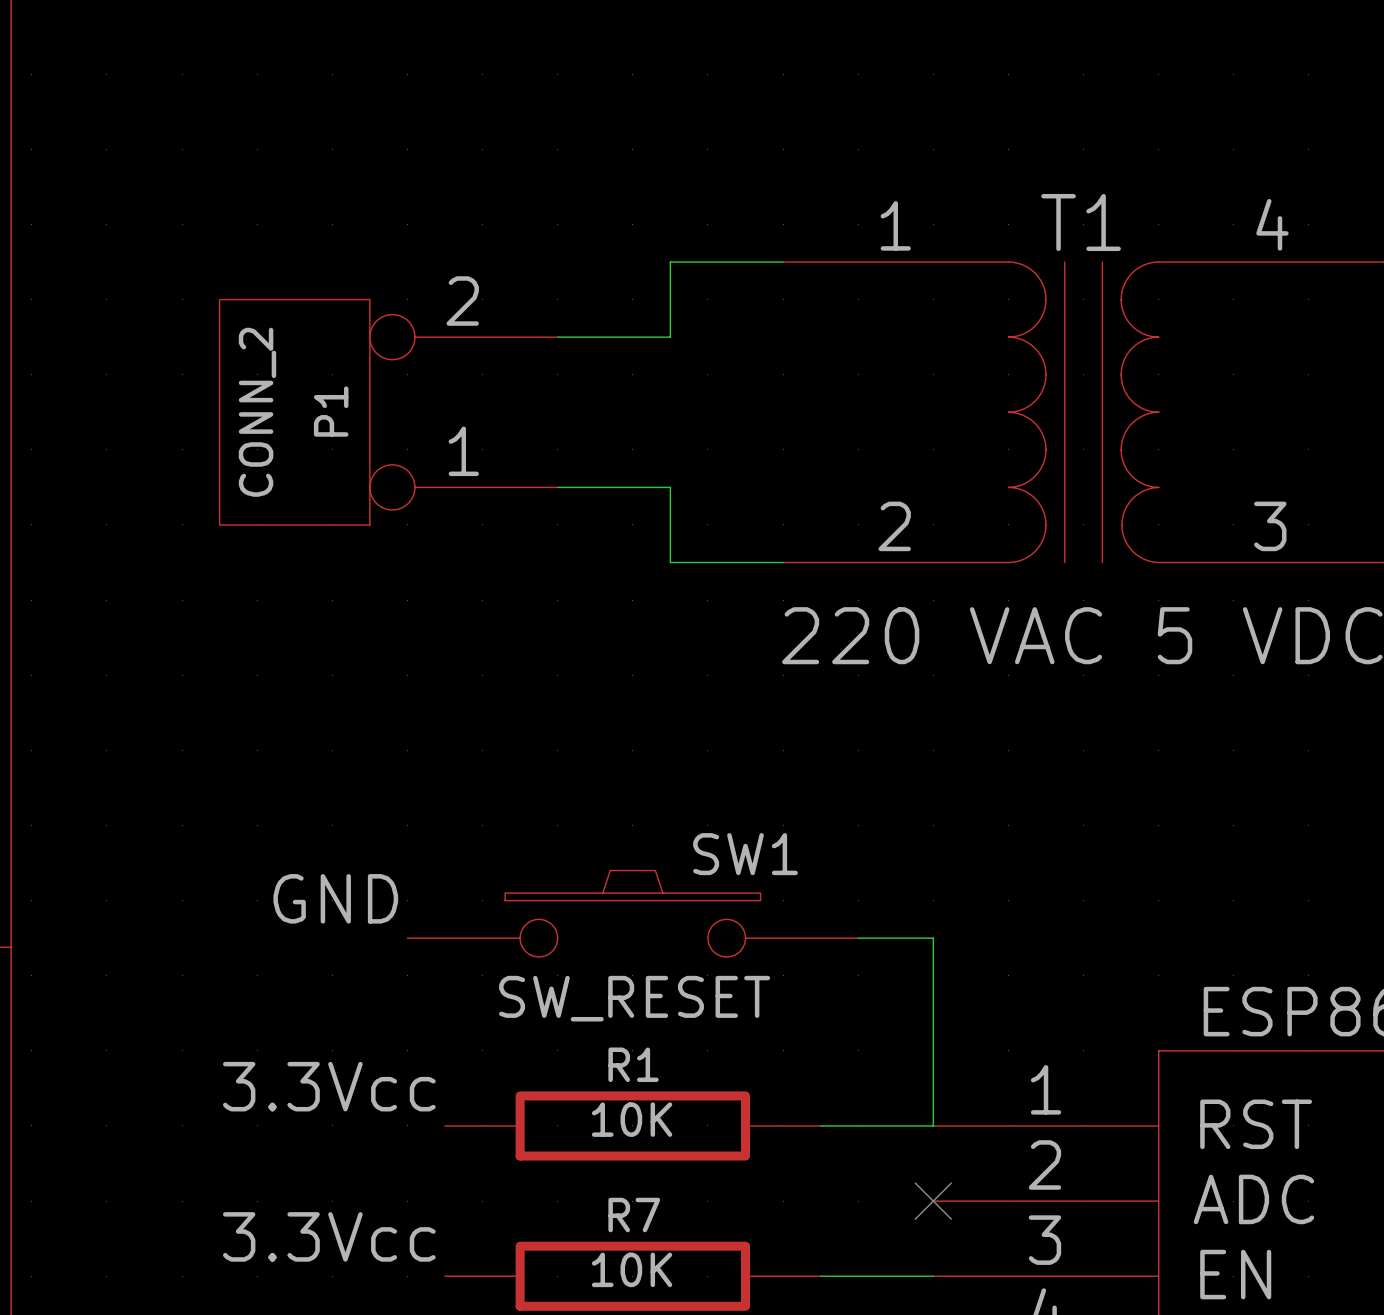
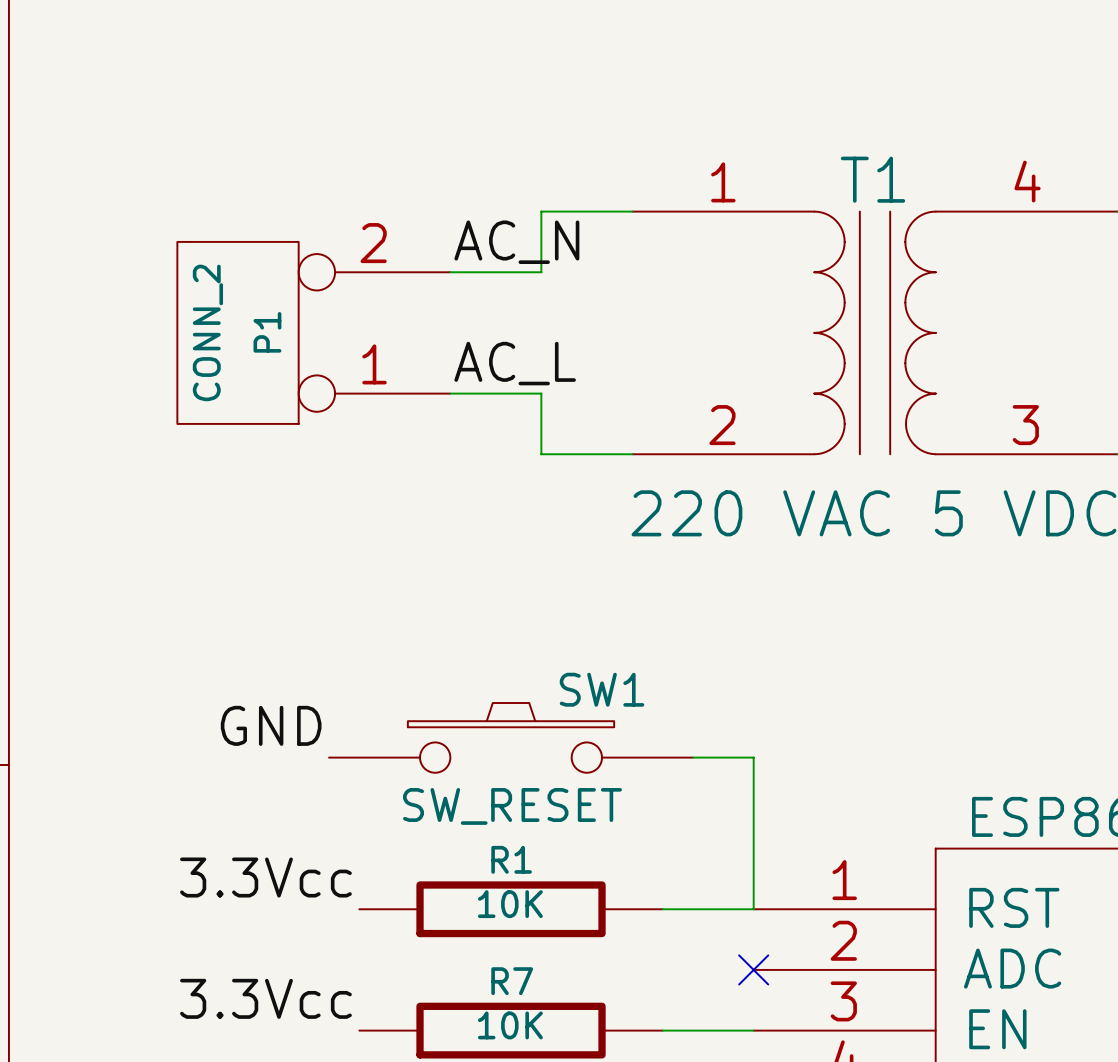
label: none -> AC_N (516, 242)
label: none -> AC_L (515, 363)

